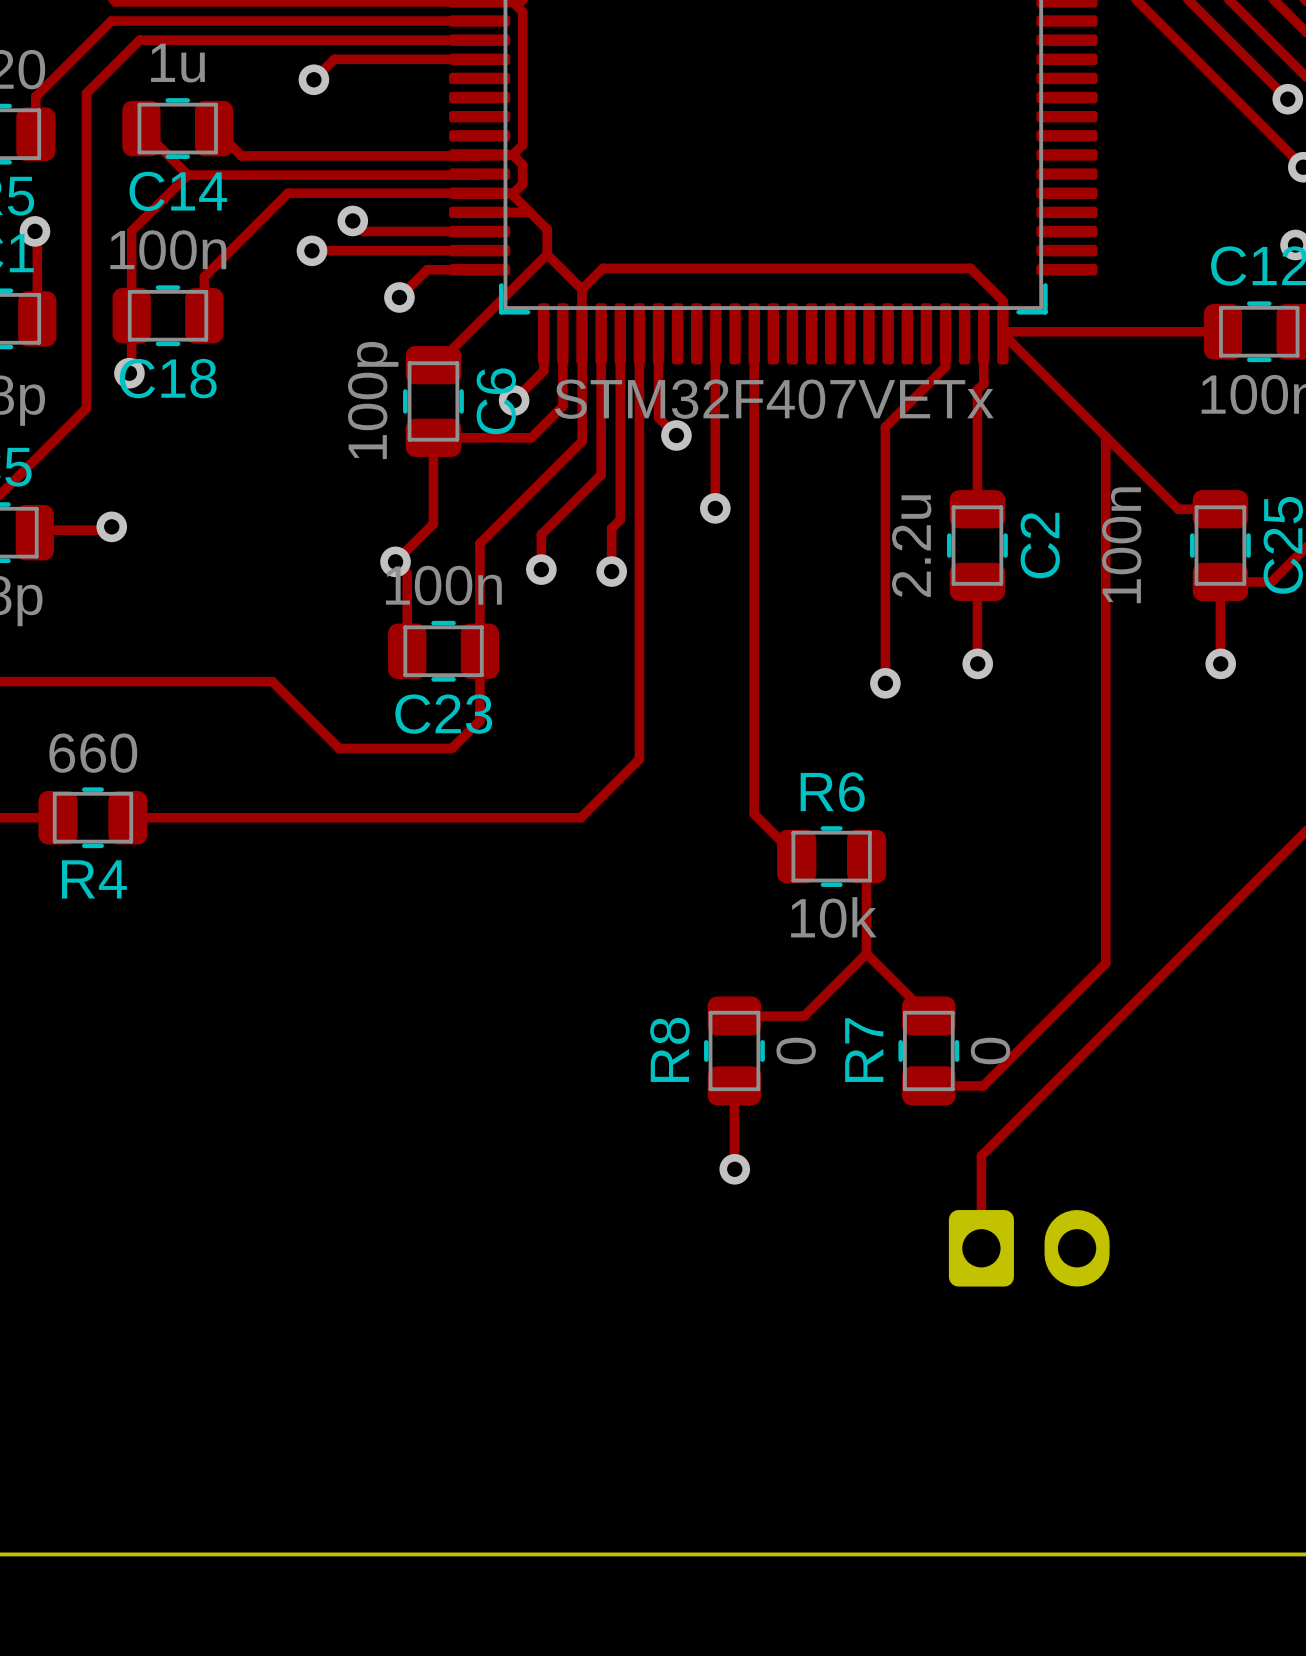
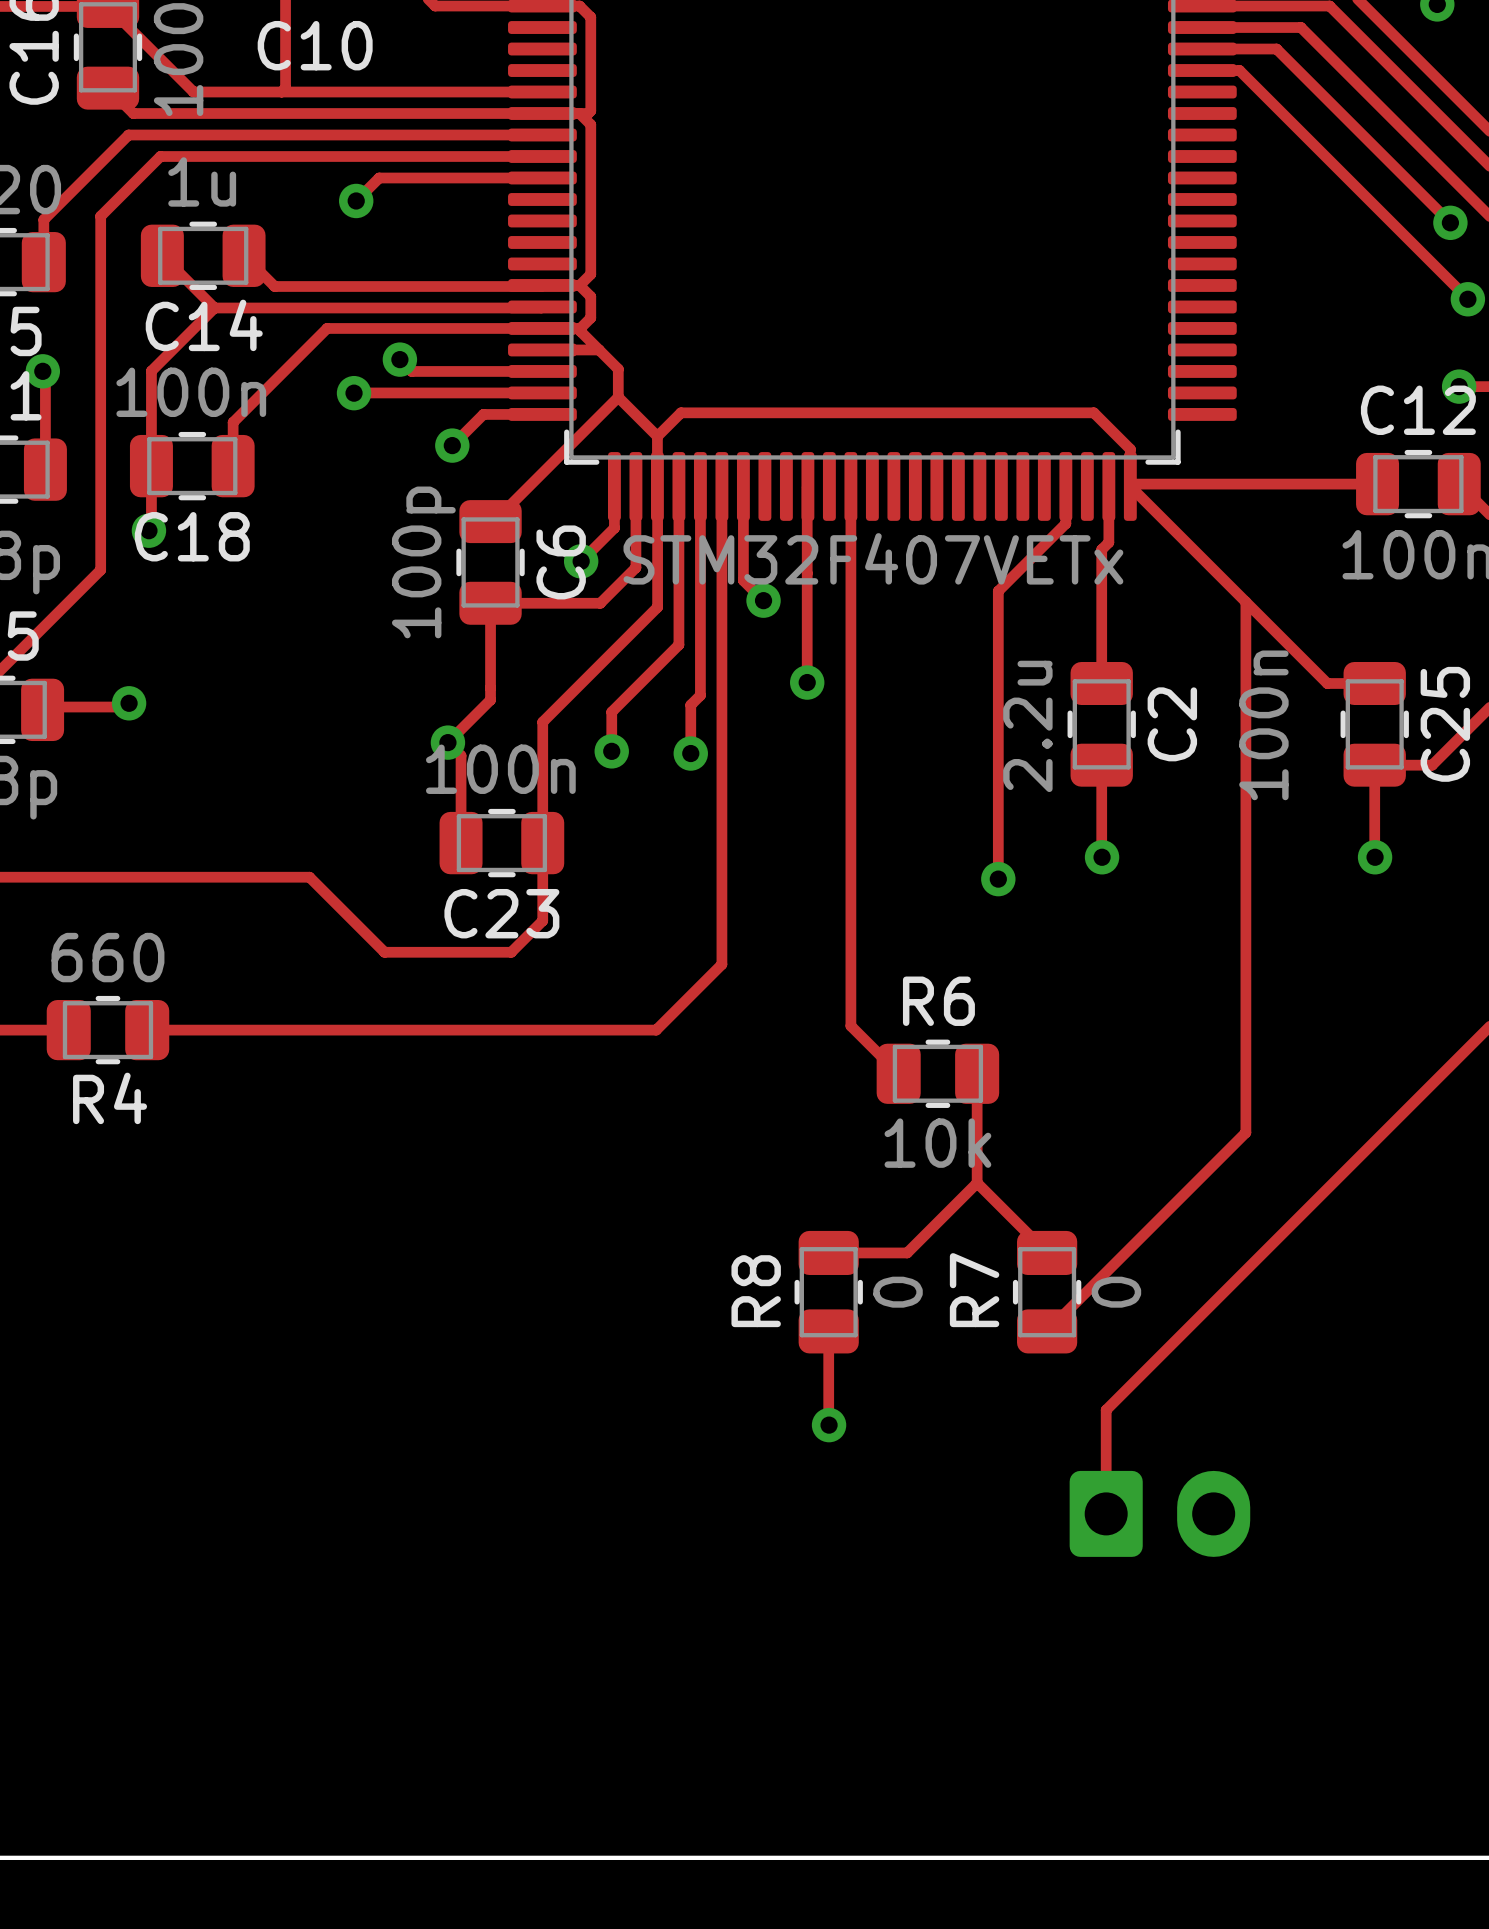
track: (1105, 908) (1105, 963) (983, 1085) (928, 1085) -> (1245, 1132) (1047, 1331)

